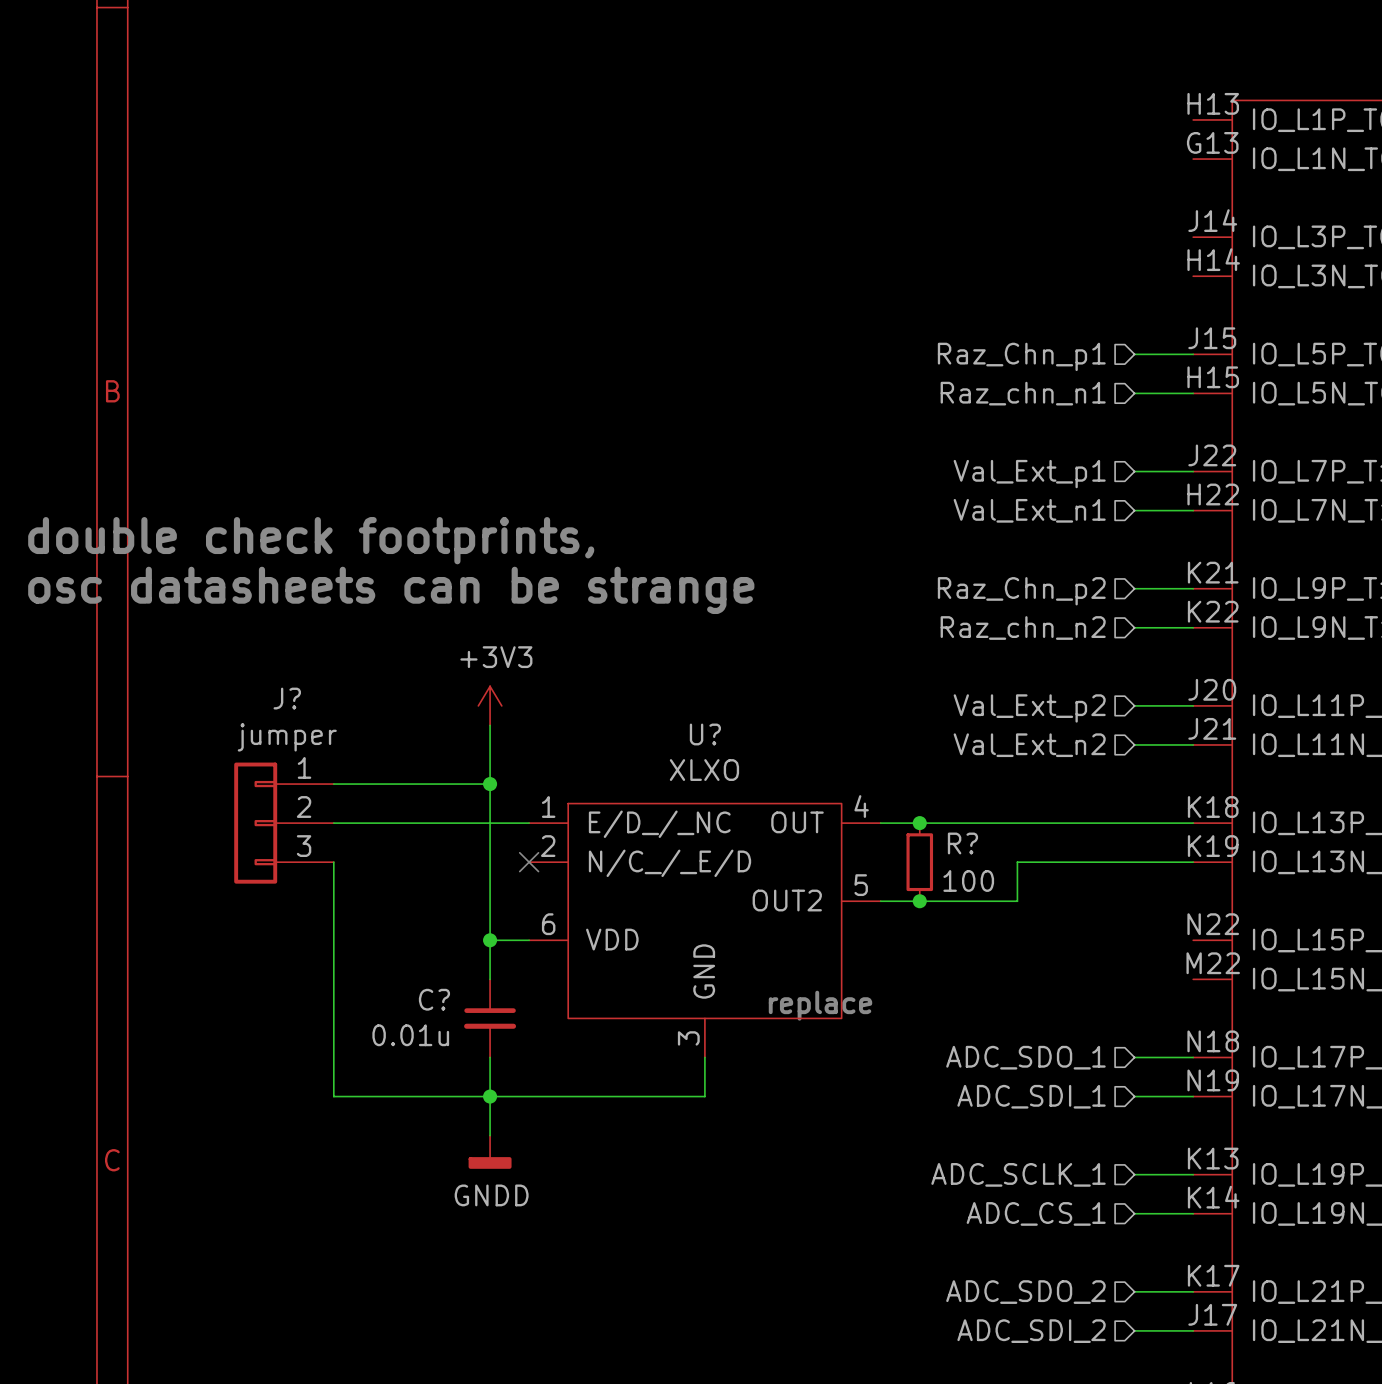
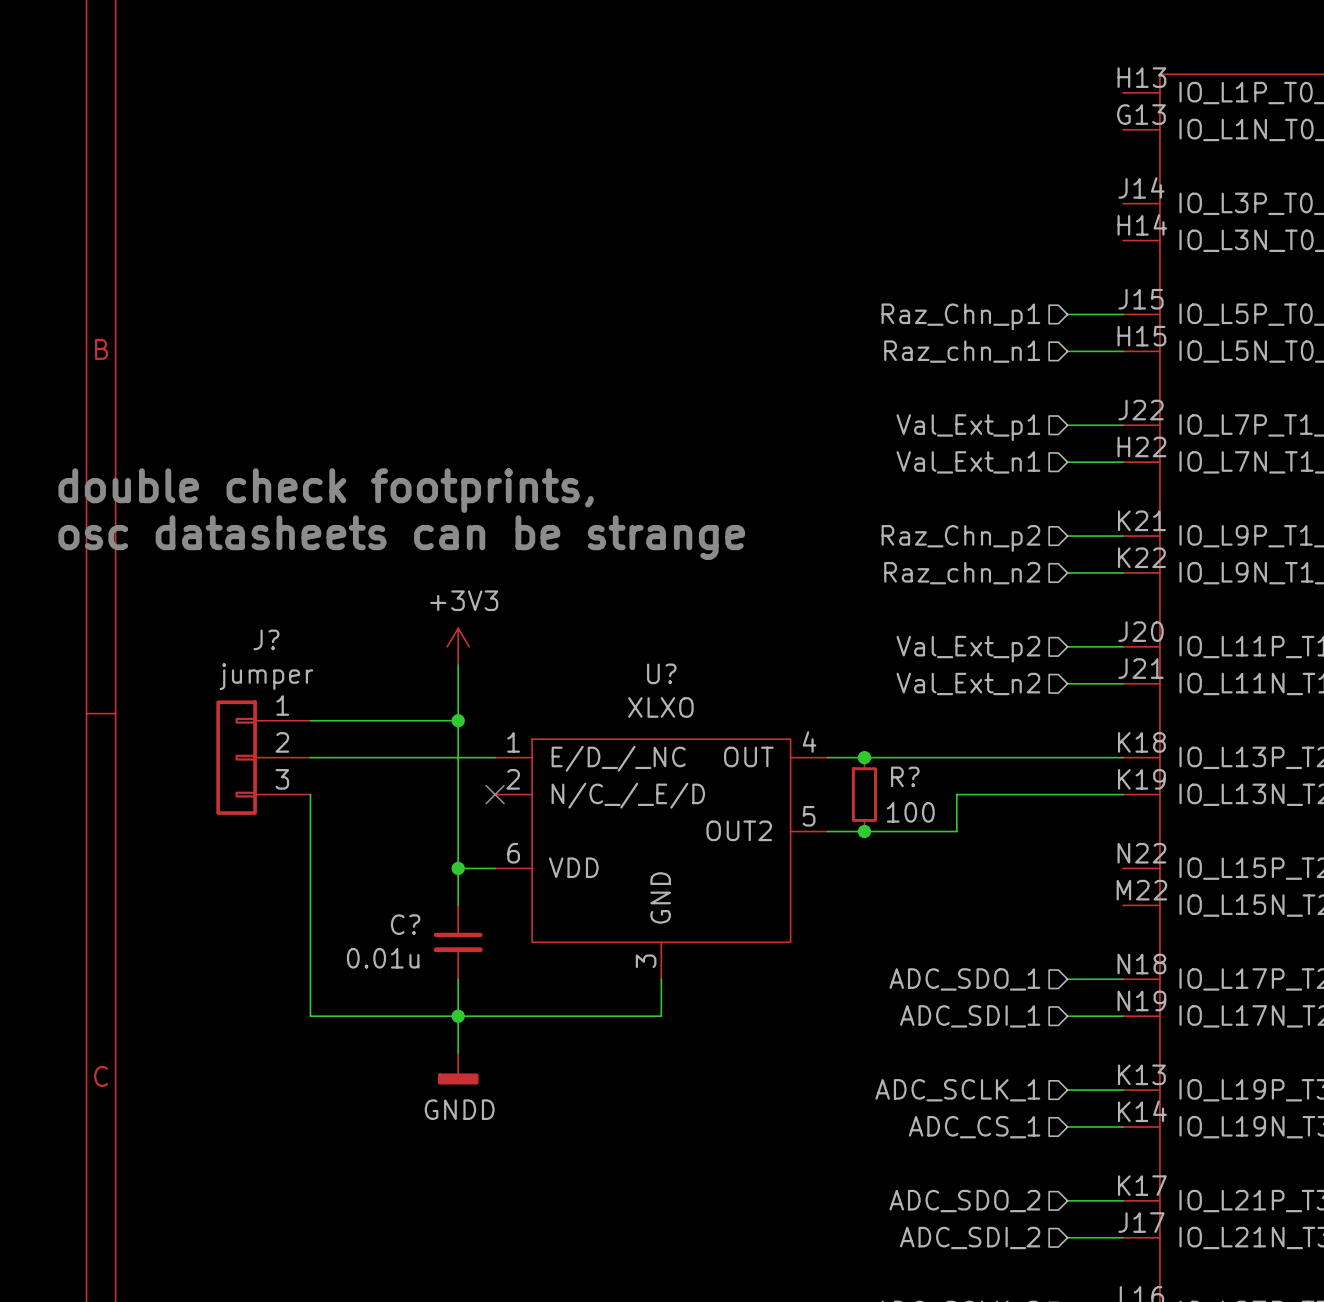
text position: double check footprints, (311, 540) -> double check footprints, (326, 490)
text position: osc datasheets can be strange (391, 590) -> osc datasheets can be strange (401, 537)
text: replace (820, 1005) -> none

